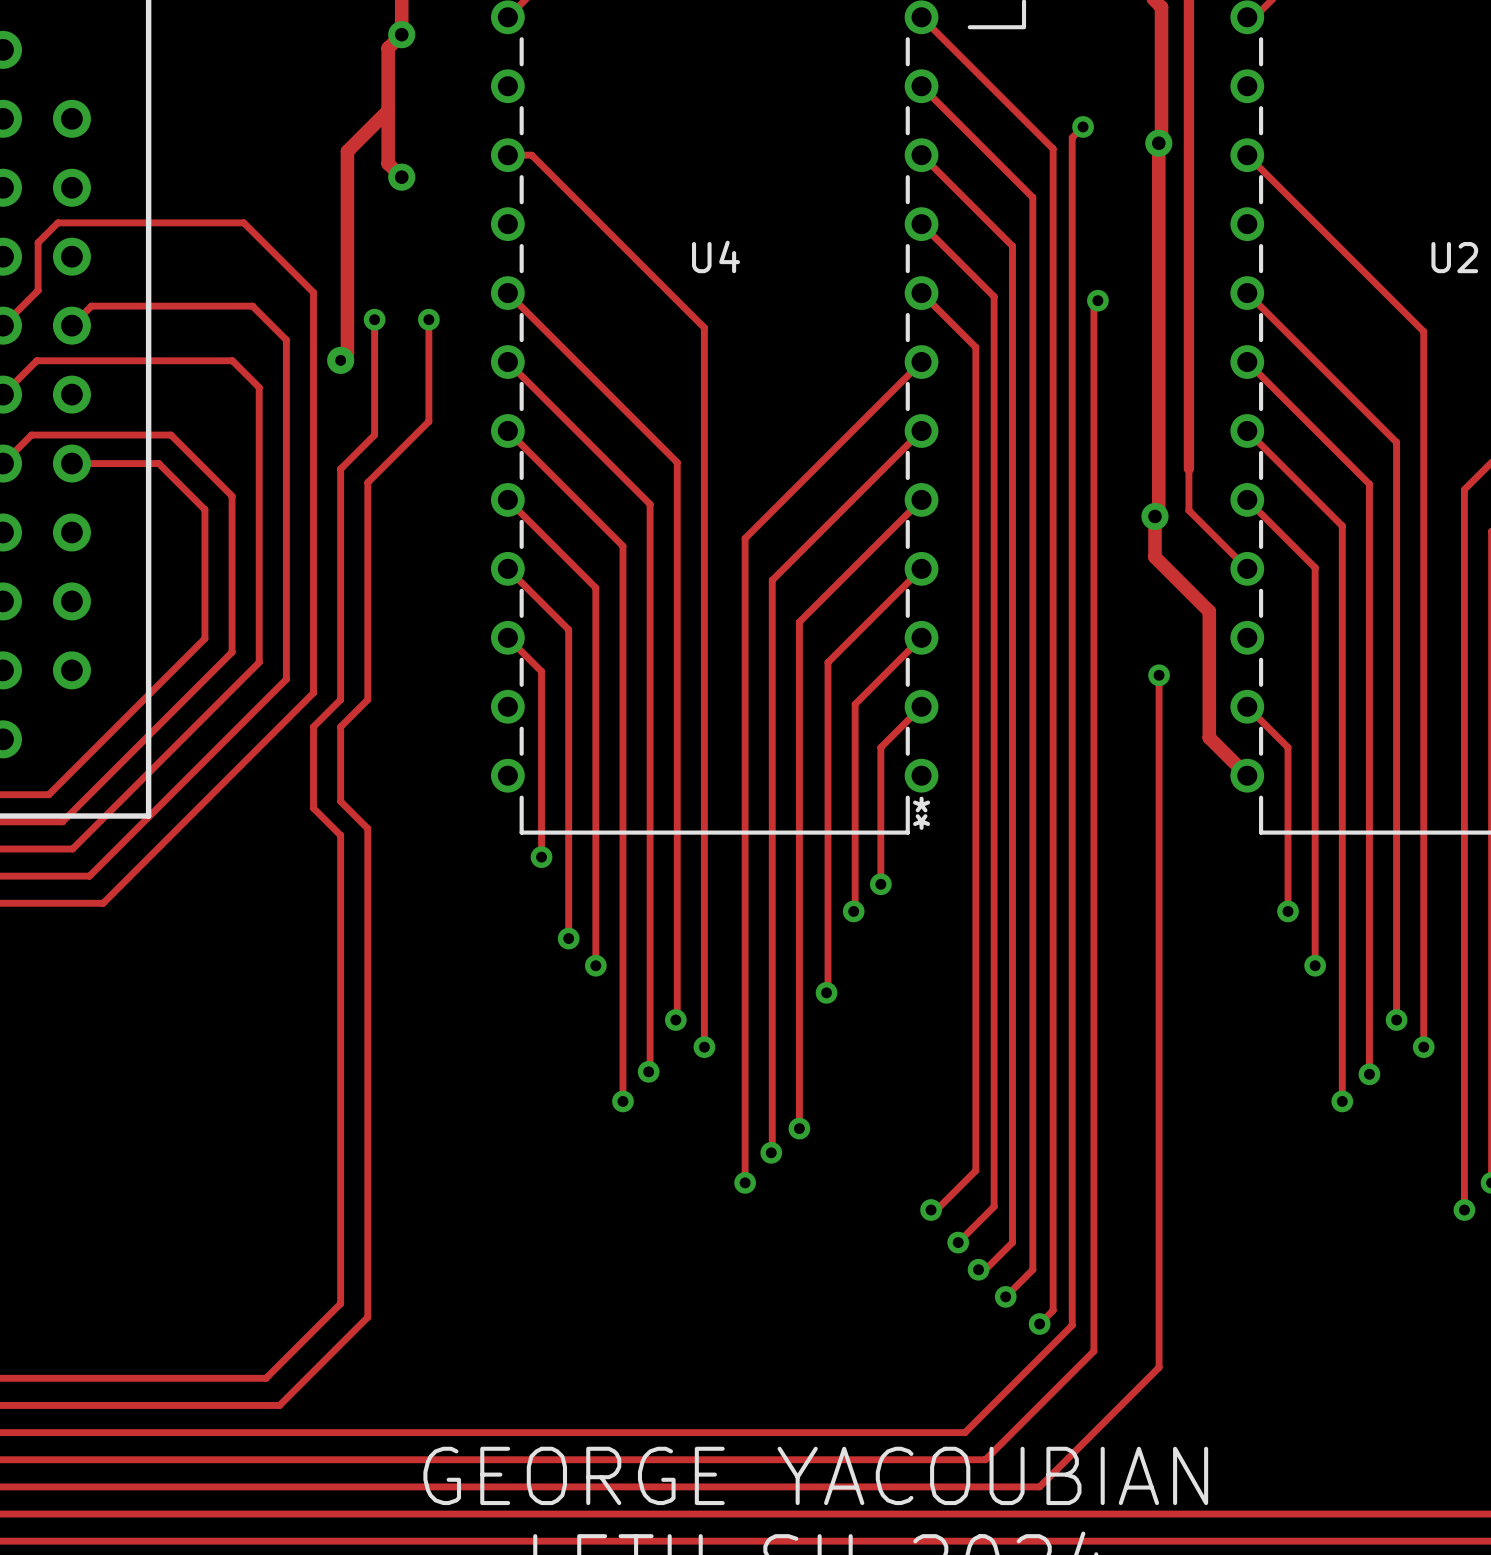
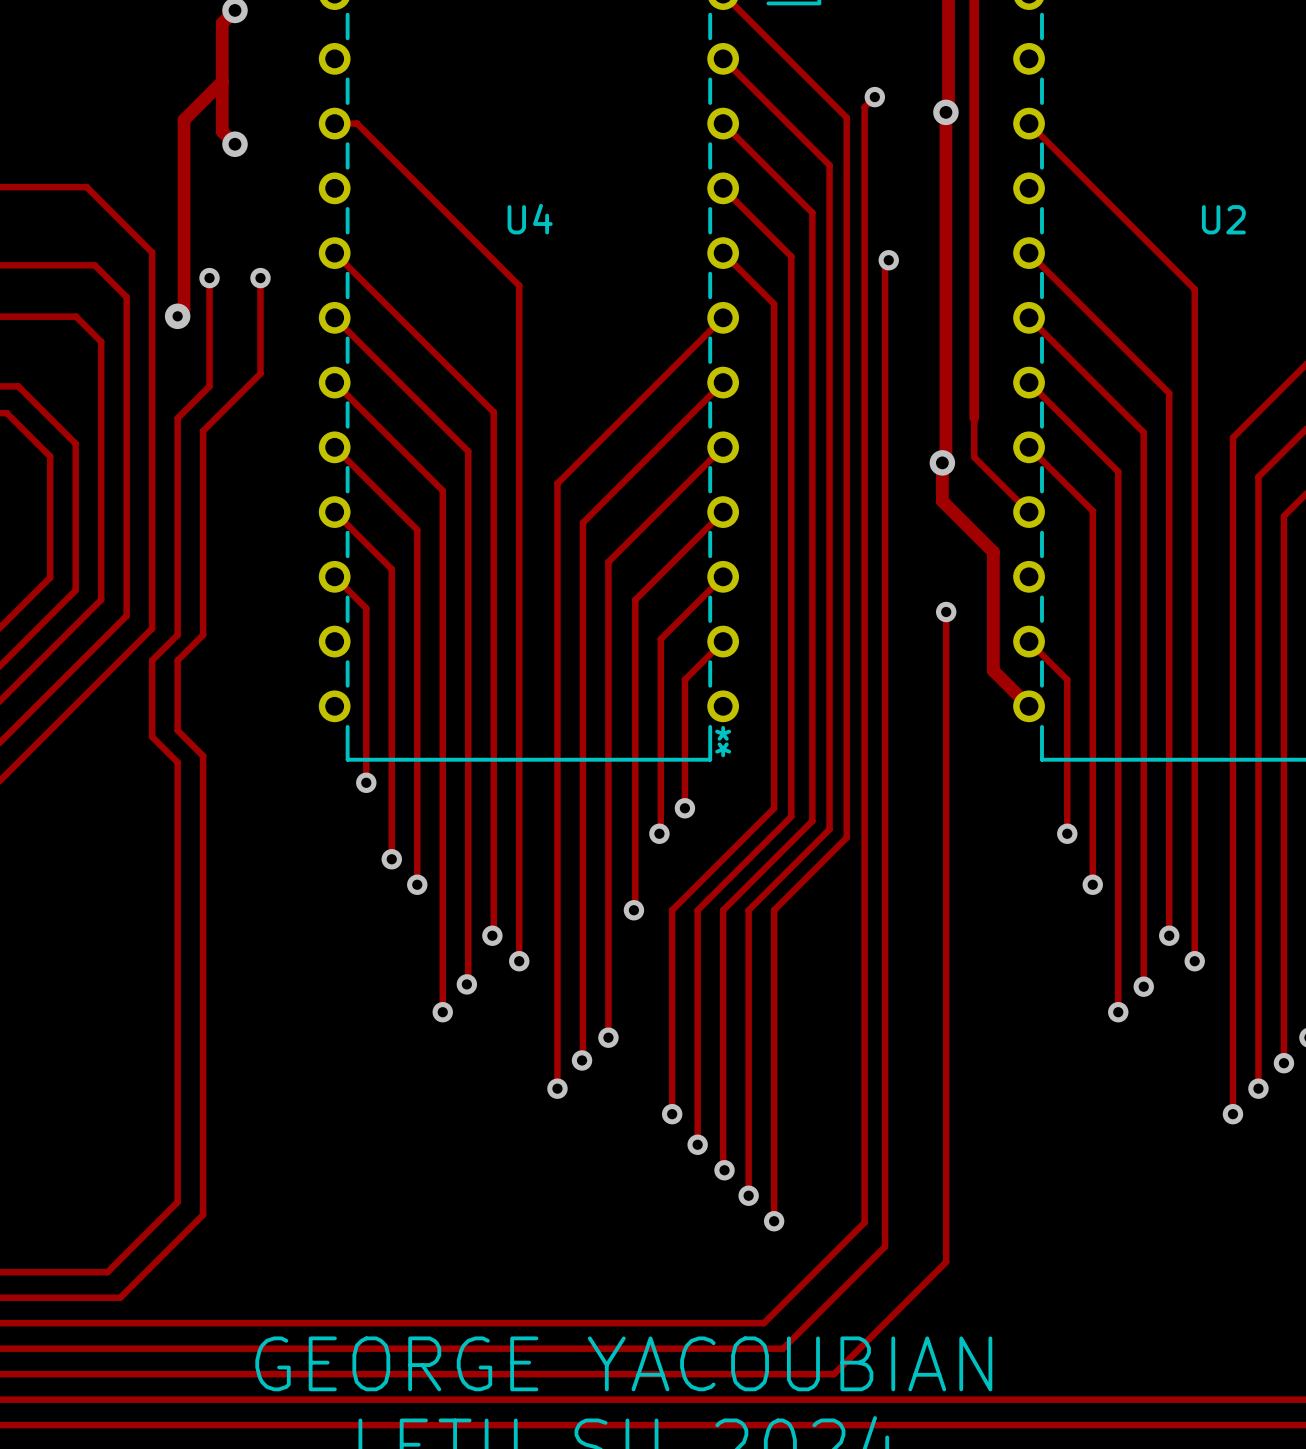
track: (1032, 197) (1032, 1269) (1005, 1296) -> (827, 163) (829, 165) (829, 829) (748, 910) (748, 1195)
track: (1012, 246) (1012, 1242) (985, 1269) (978, 1269) -> (808, 208) (812, 212) (812, 821) (723, 910) (724, 1170)
track: (975, 884) (975, 992) -> (846, 837) (774, 910)
track: none -> (774, 808) (672, 910) (672, 1114)
track: (994, 893) (994, 1206) (958, 1242) -> (791, 816) (697, 910) (697, 1144)
track: (1053, 915) (1053, 1310) (1039, 1324) -> none
track: (975, 1170) (936, 1210) (931, 1210) -> (774, 1077) (774, 1221)
via: none -> (672, 1114)
via: (931, 1210) -> none
via: none -> (697, 1144)
via: (958, 1242) -> none
via: none -> (724, 1170)
via: (978, 1269) -> none
via: none -> (748, 1195)
via: (1005, 1296) -> none
via: none -> (774, 1221)
via: (1039, 1324) -> none

